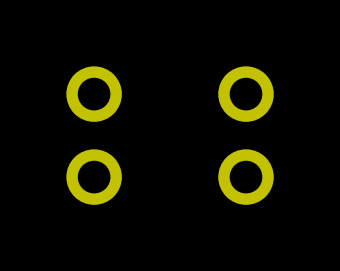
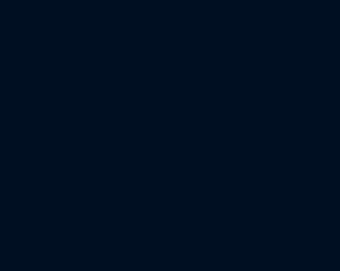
part: (94, 135) -> none
part: (246, 135) -> none

